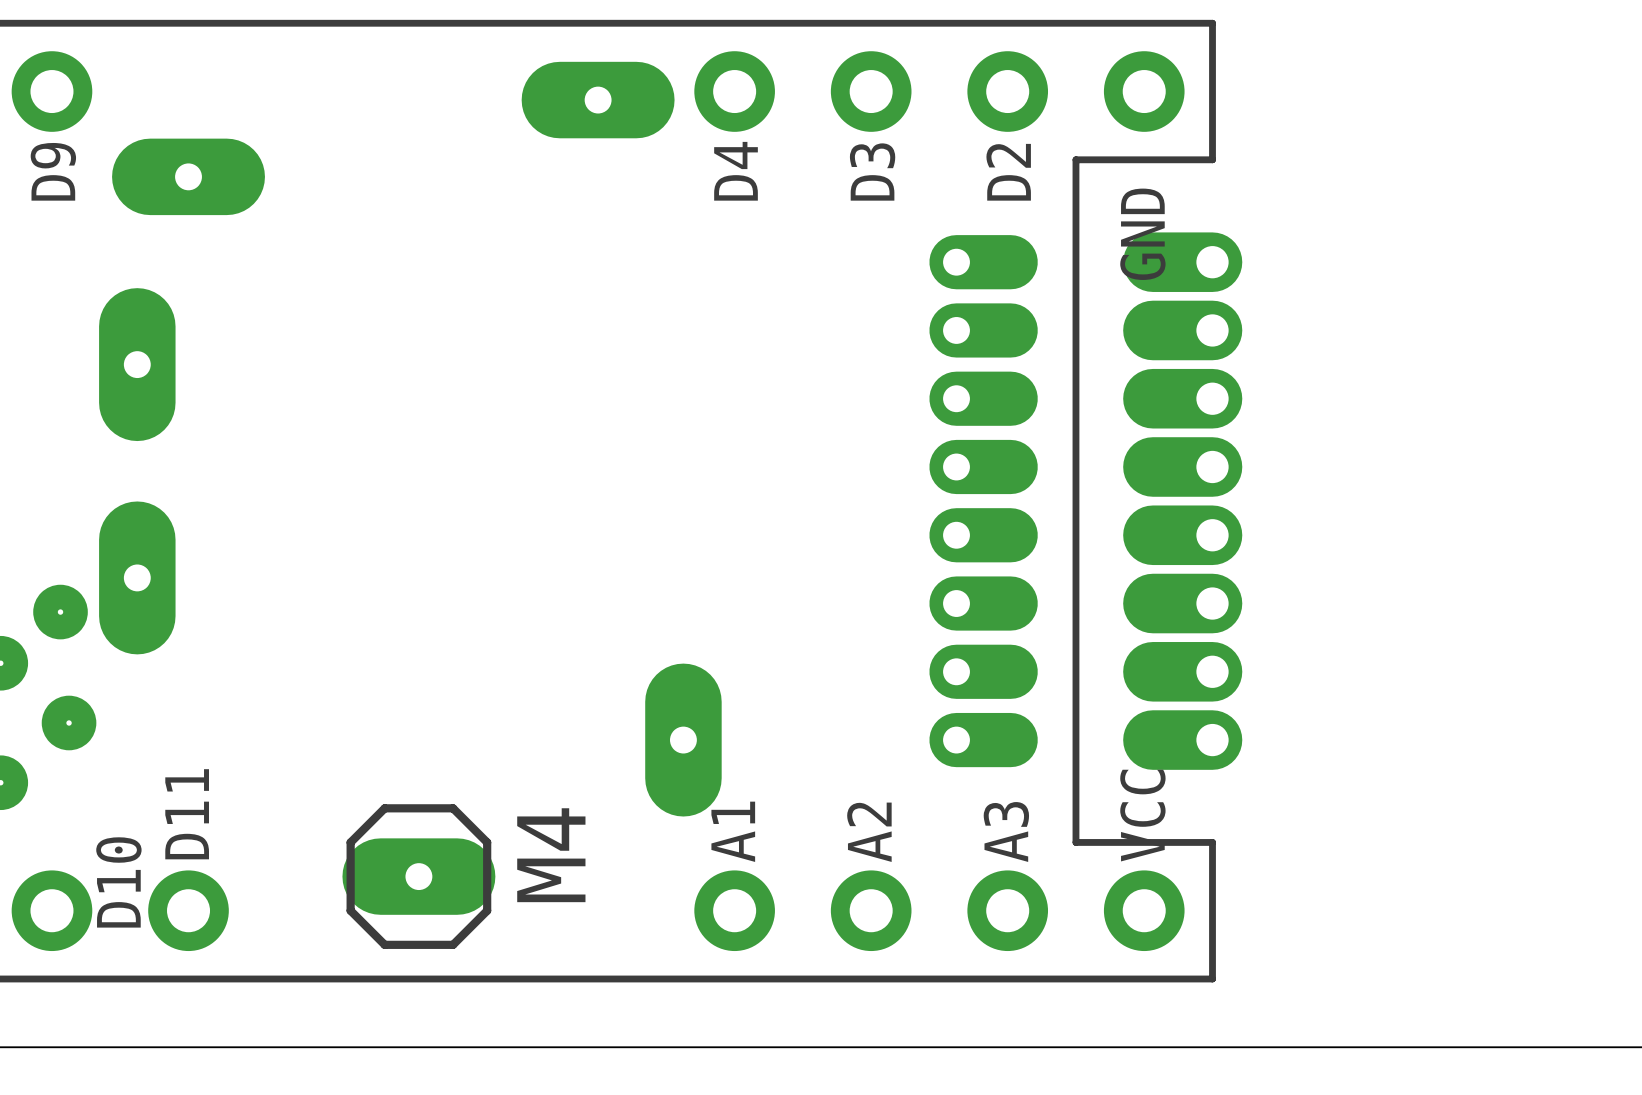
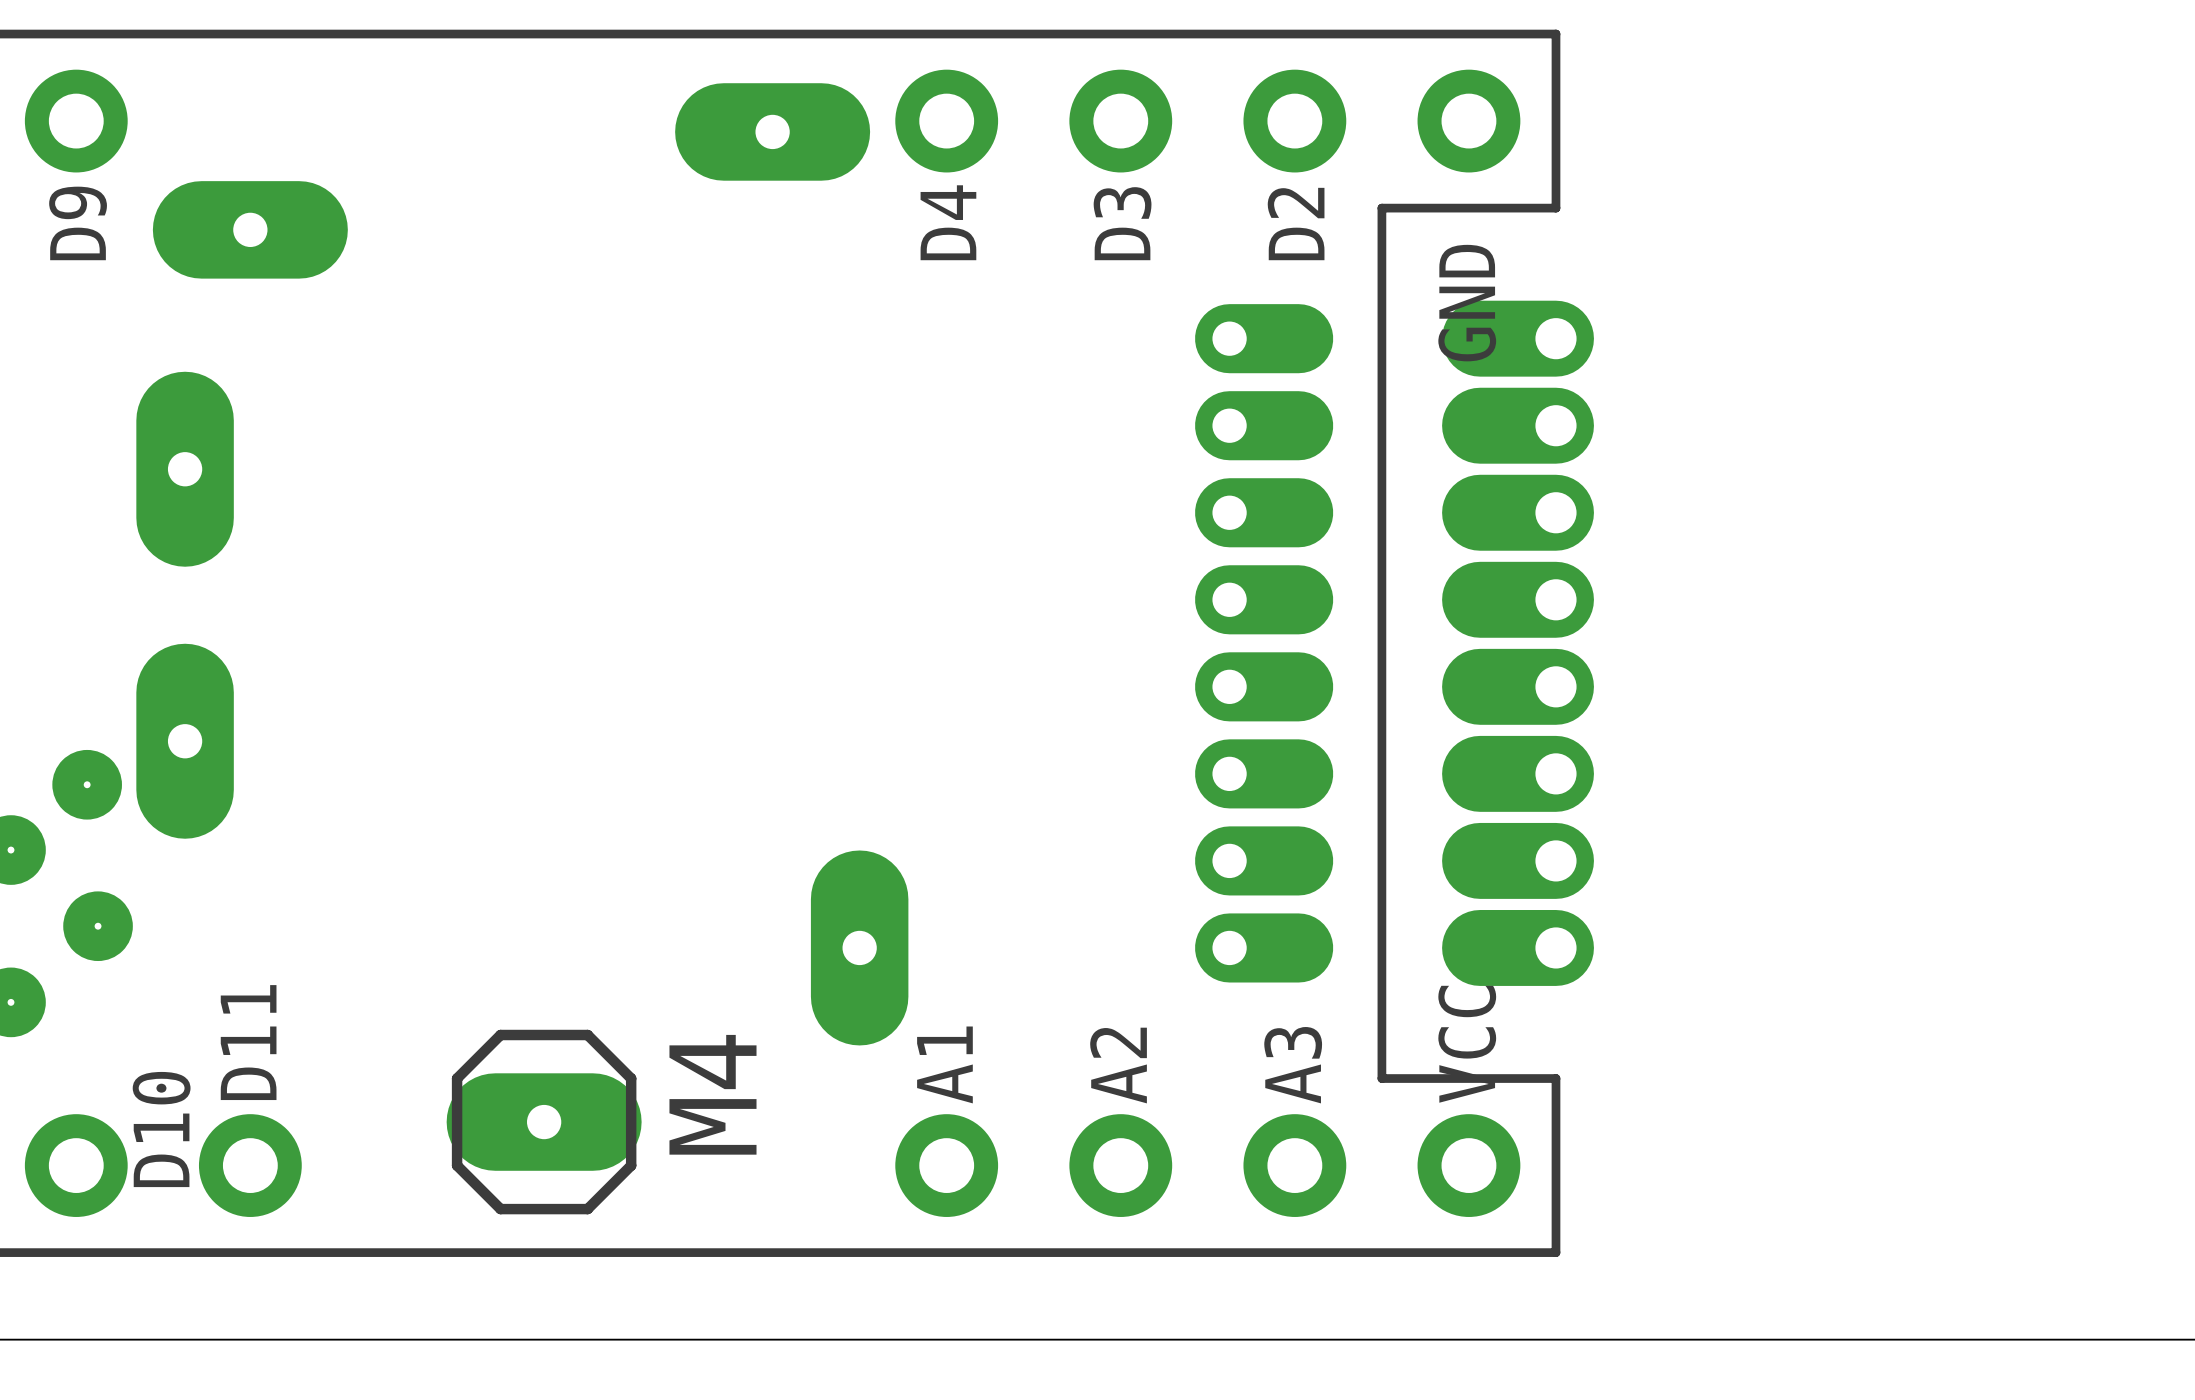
part position: (683, 740) -> (859, 947)

